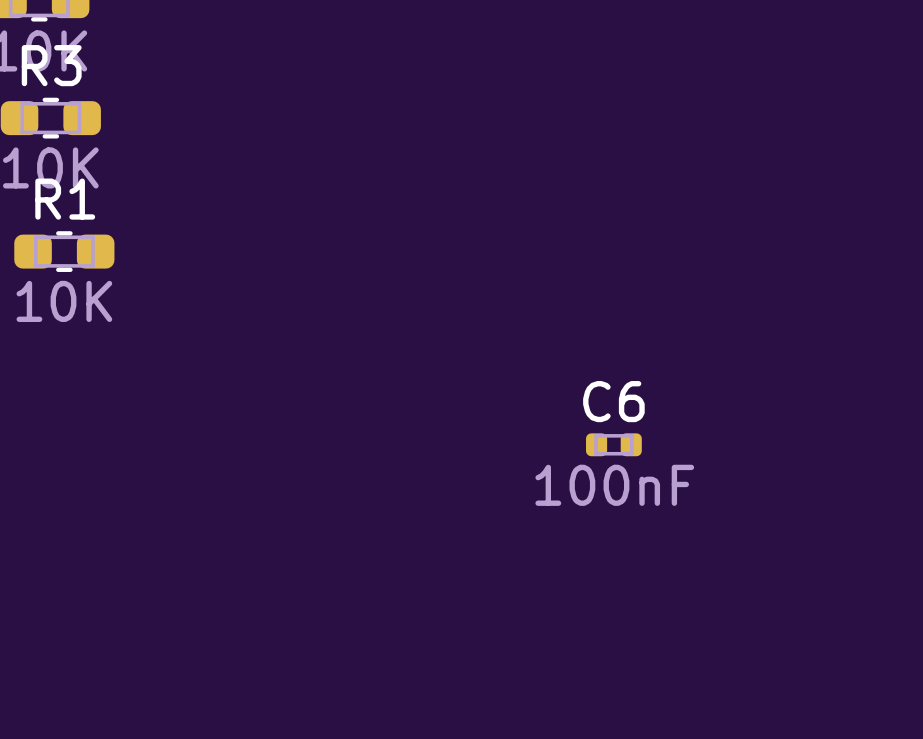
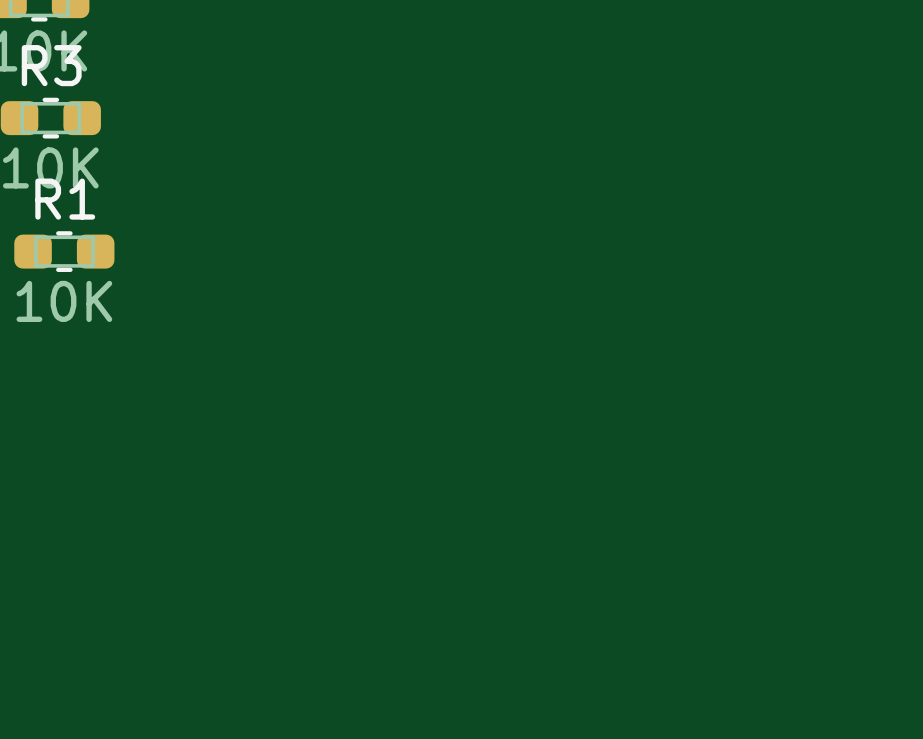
C6: 100nF (613, 444) -> none

